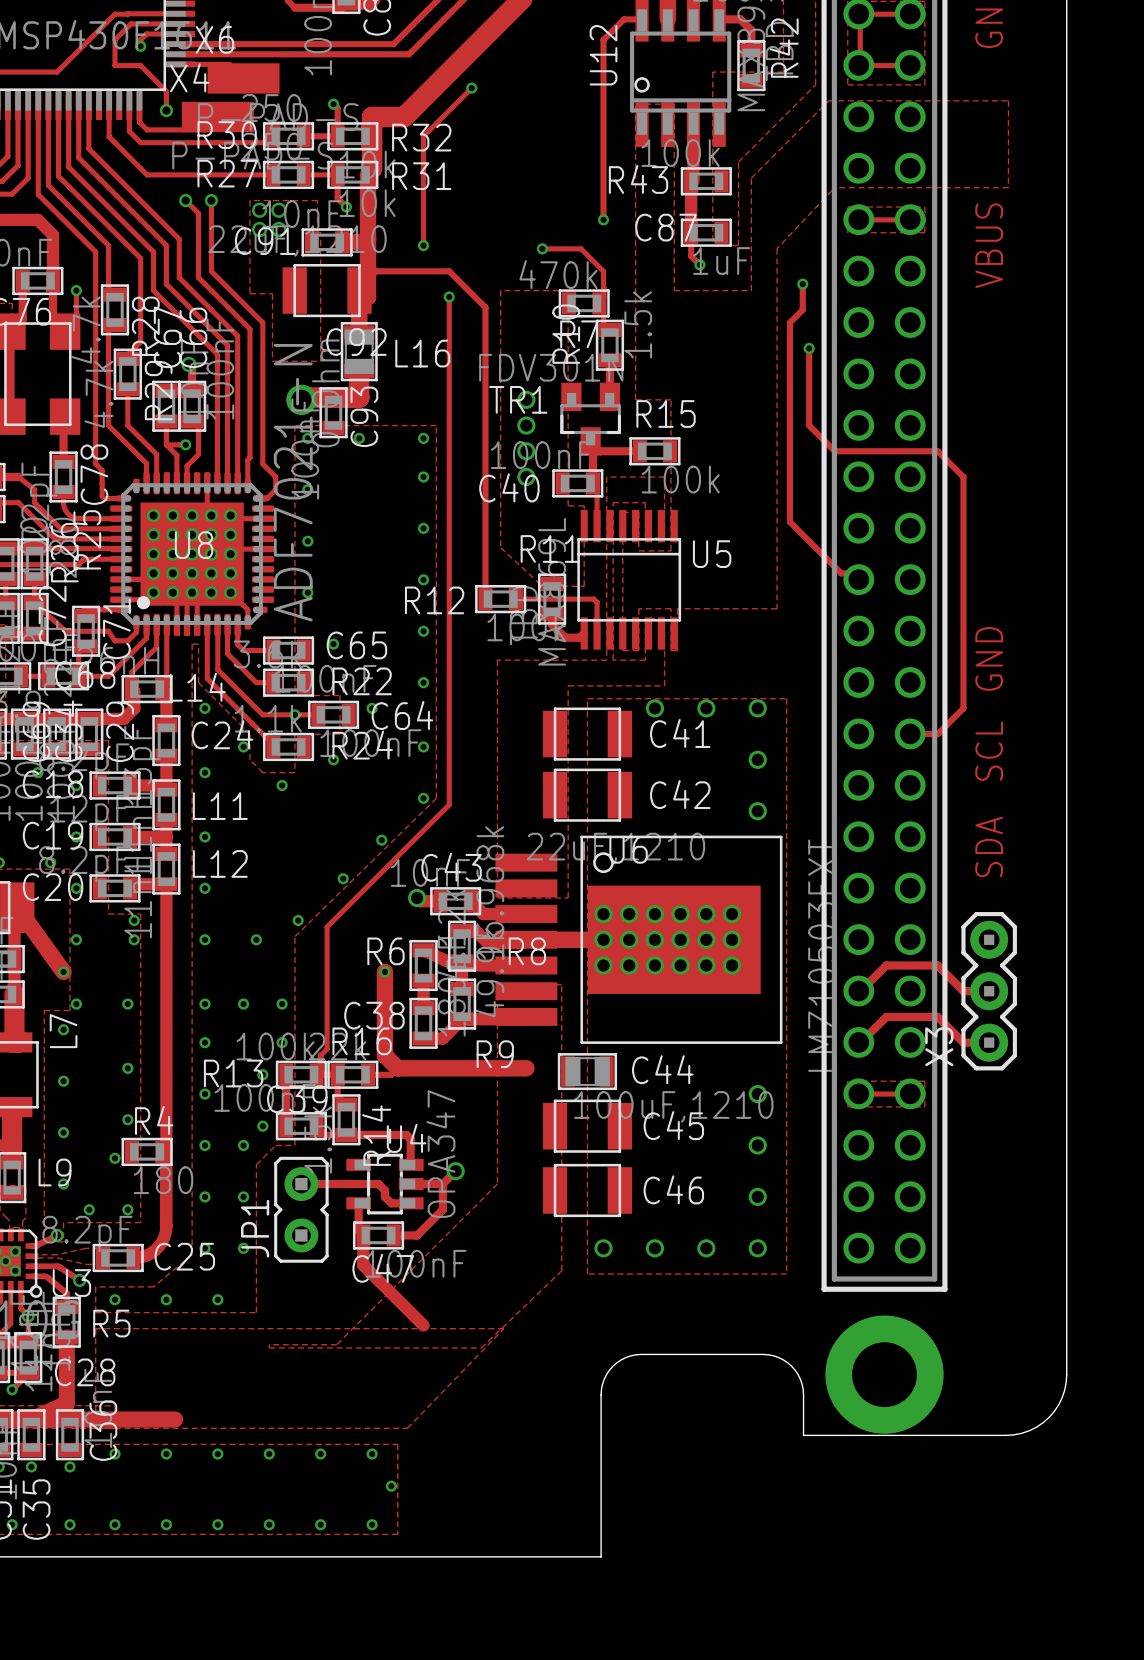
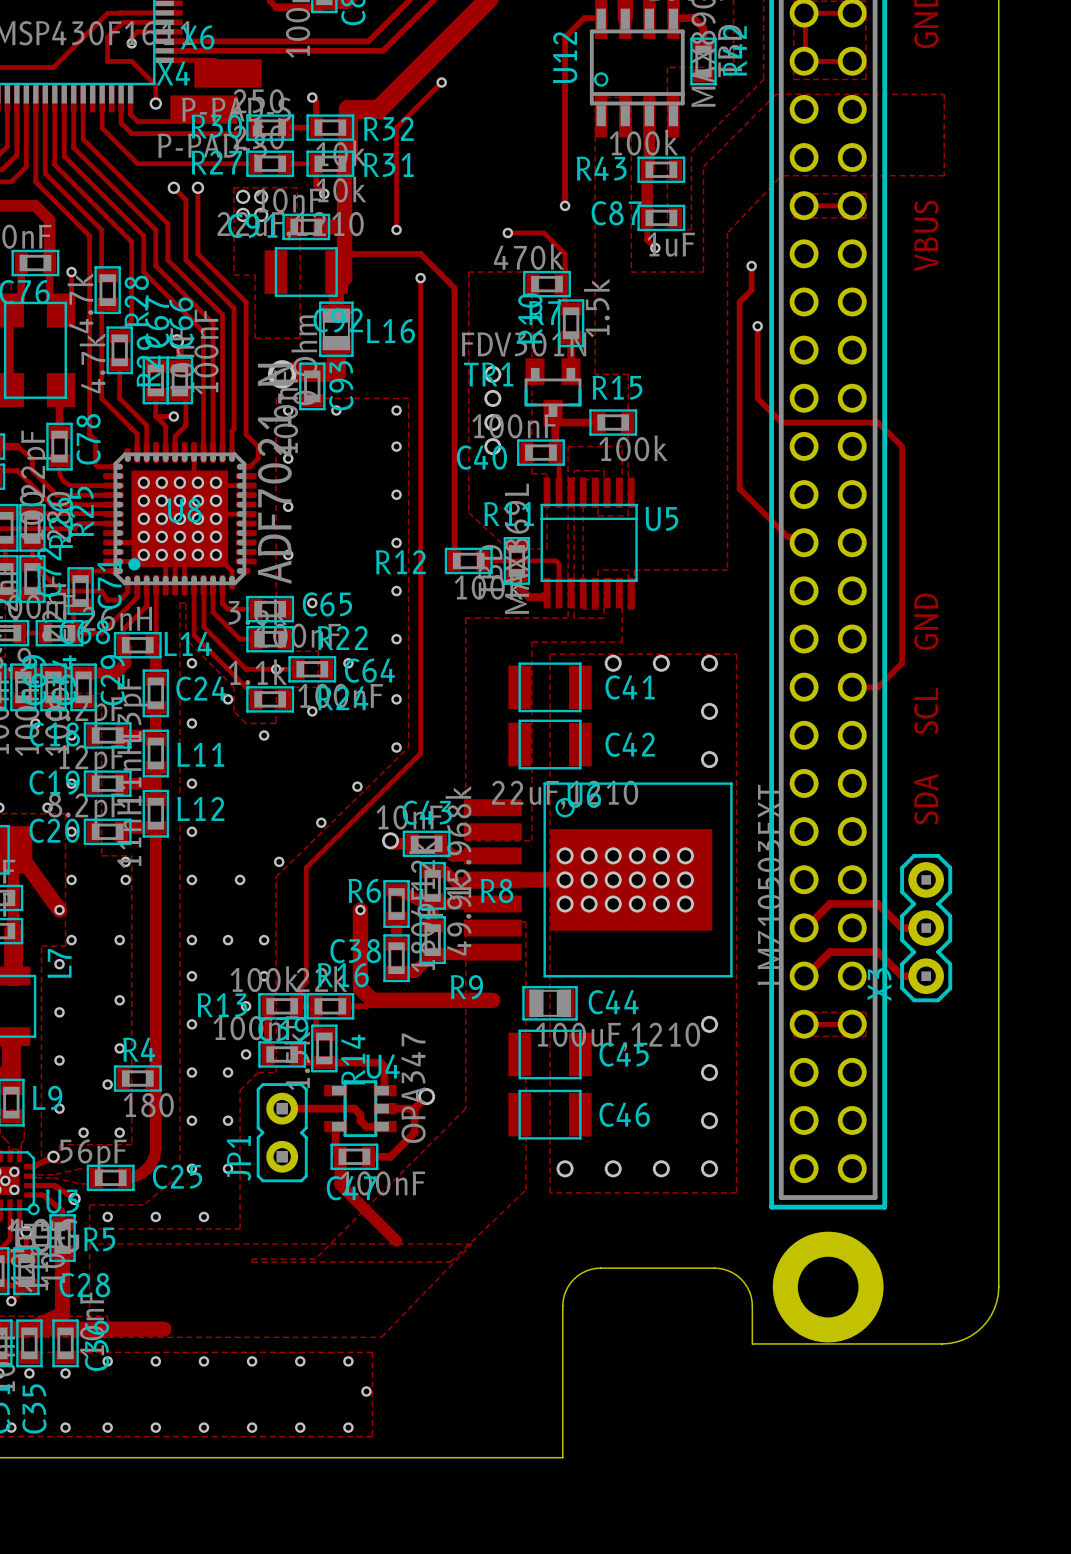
C25 value: 8.2pF (87, 1233) -> 56pF (93, 1155)

